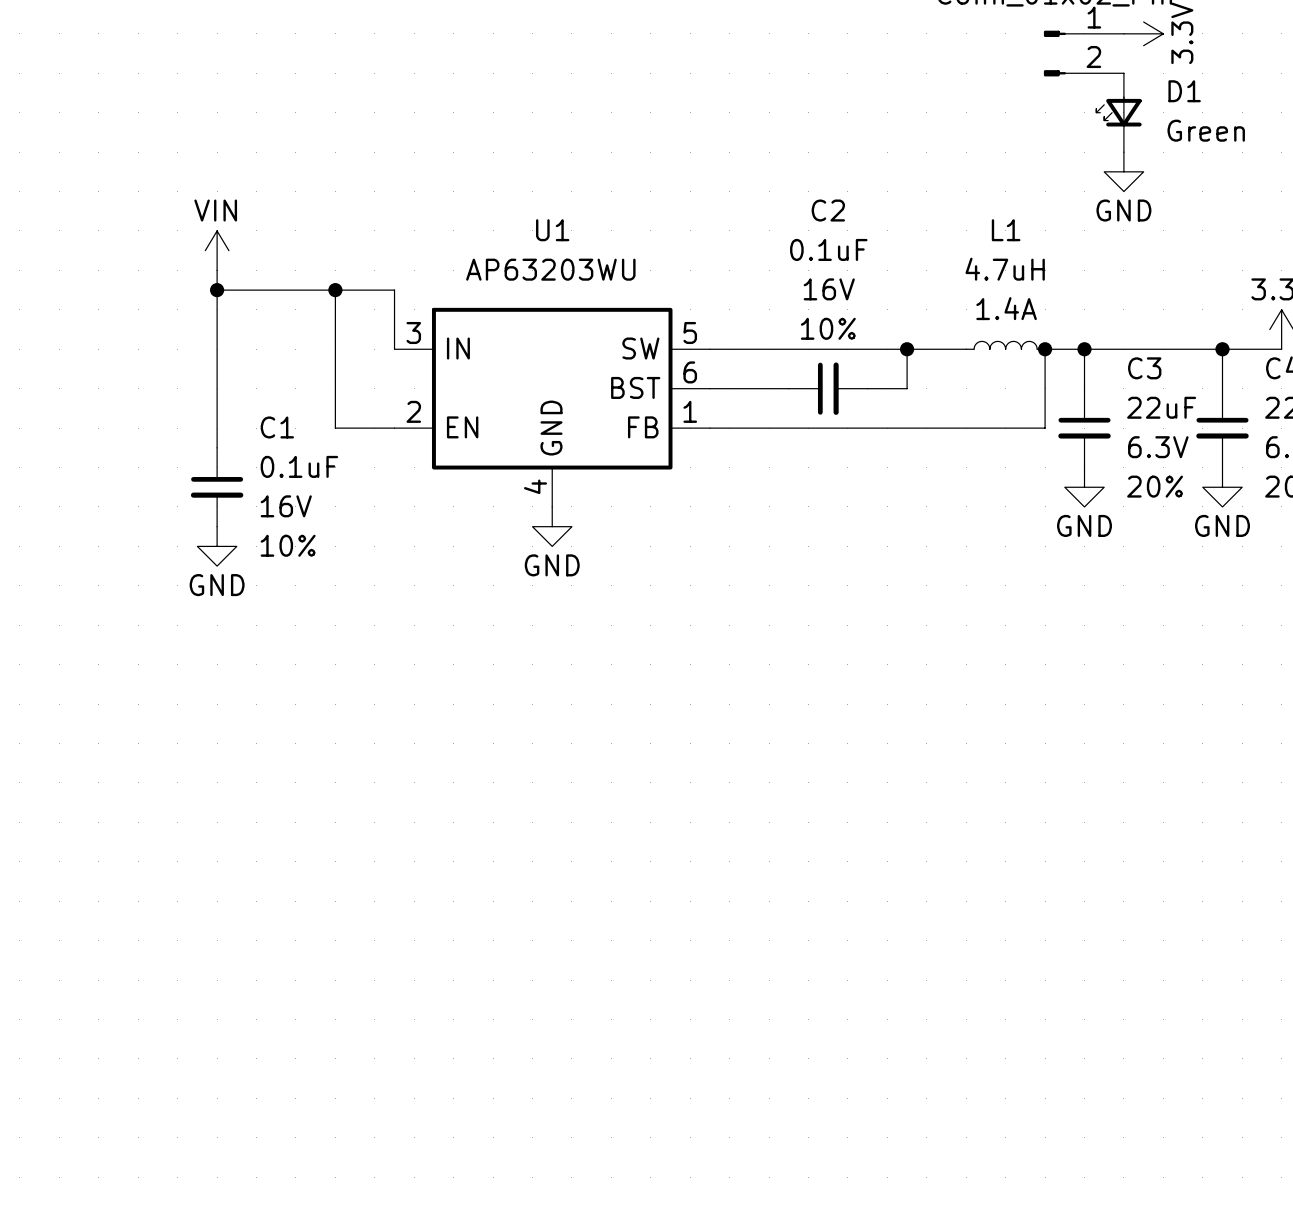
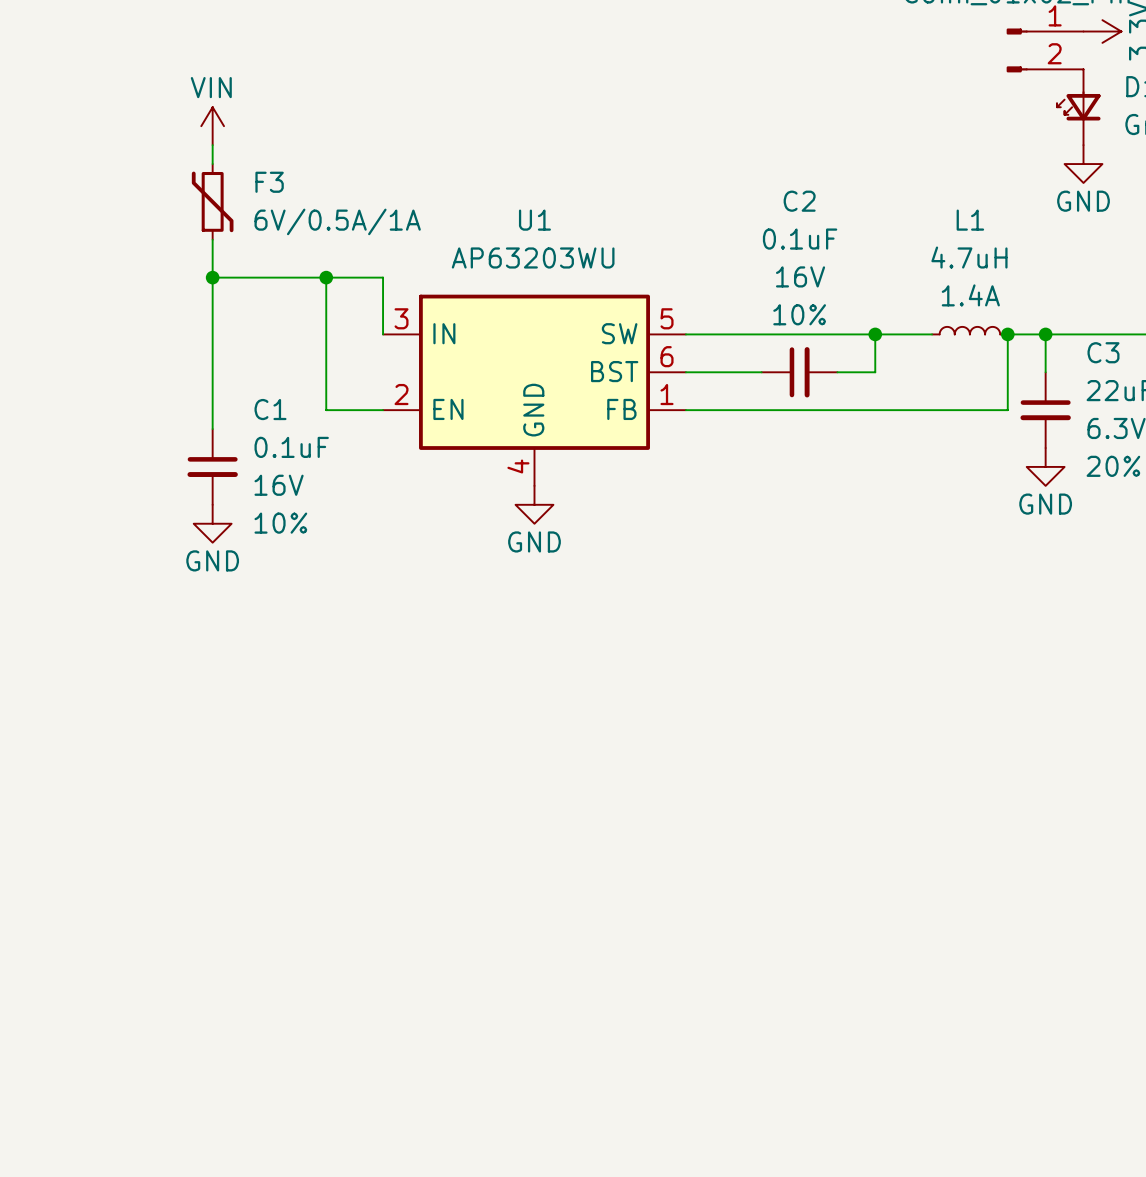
wire: none -> (212, 145) (212, 164)
F3: none -> 6V/0.5A/1A (212, 201)
power symbol position: VIN (217, 250) -> VIN (212, 126)

